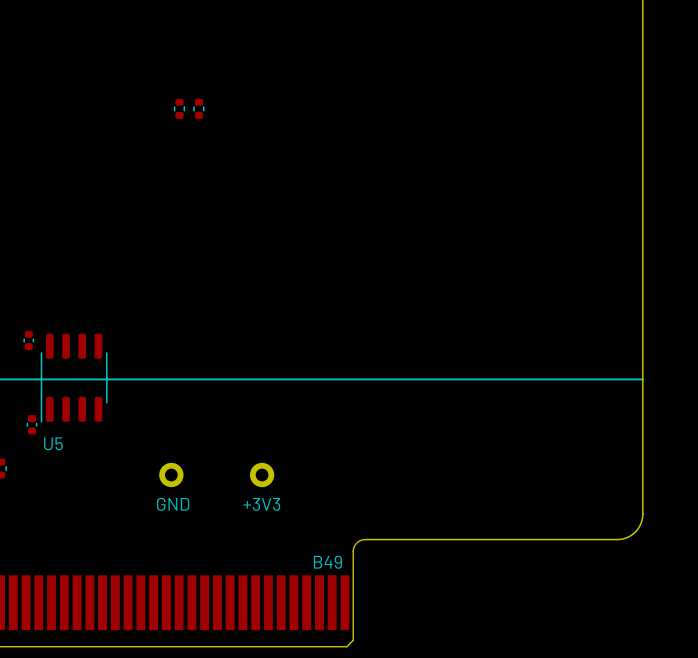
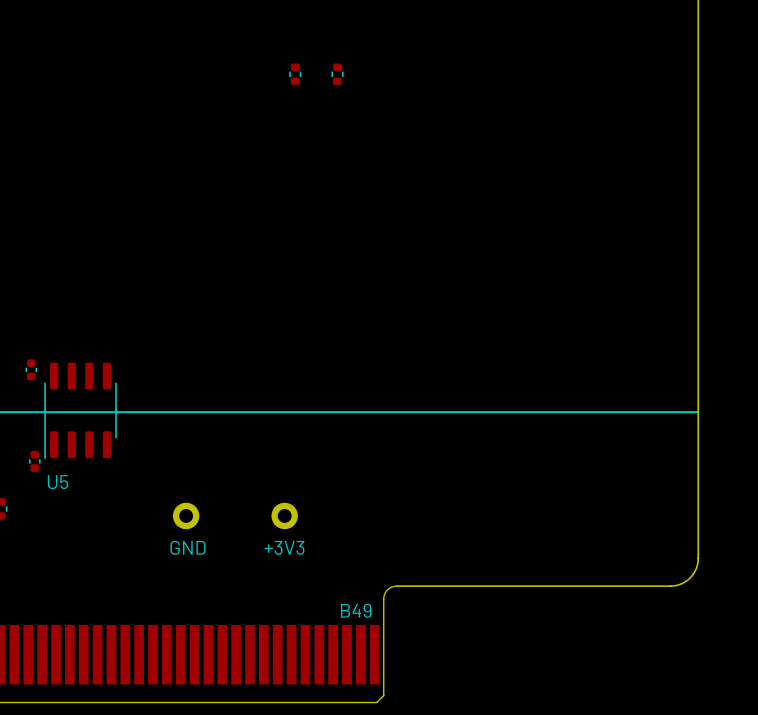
part: none -> (295, 74)
part: none -> (337, 74)
part: (179, 108) -> none
part: (198, 108) -> none

